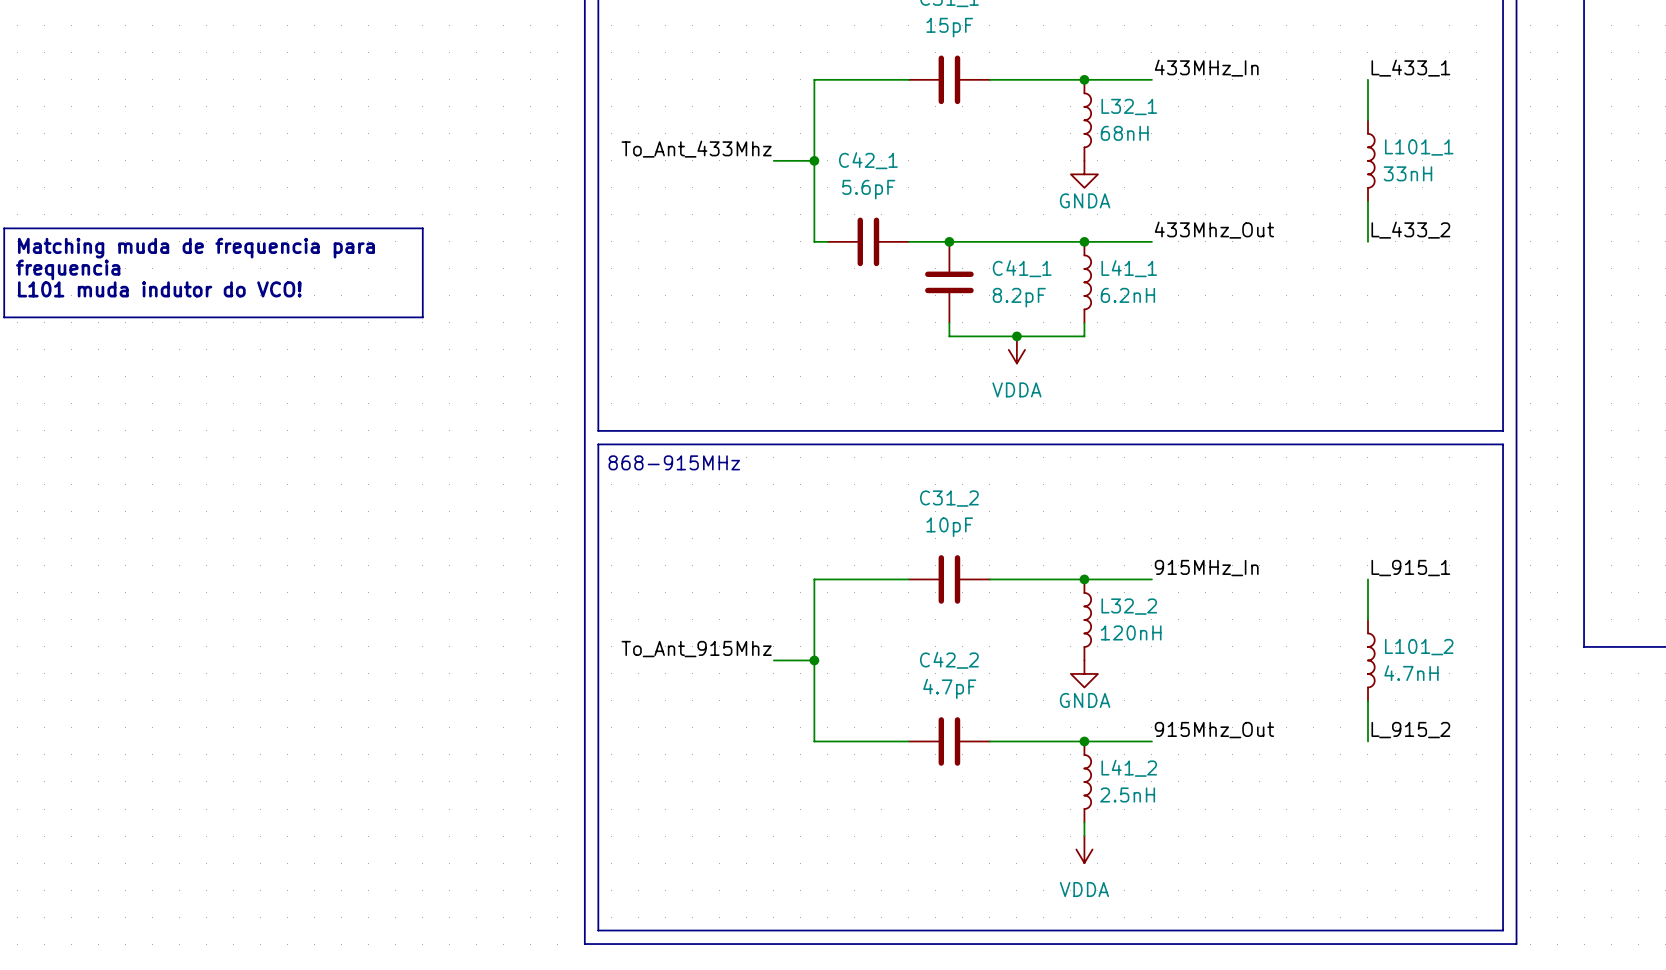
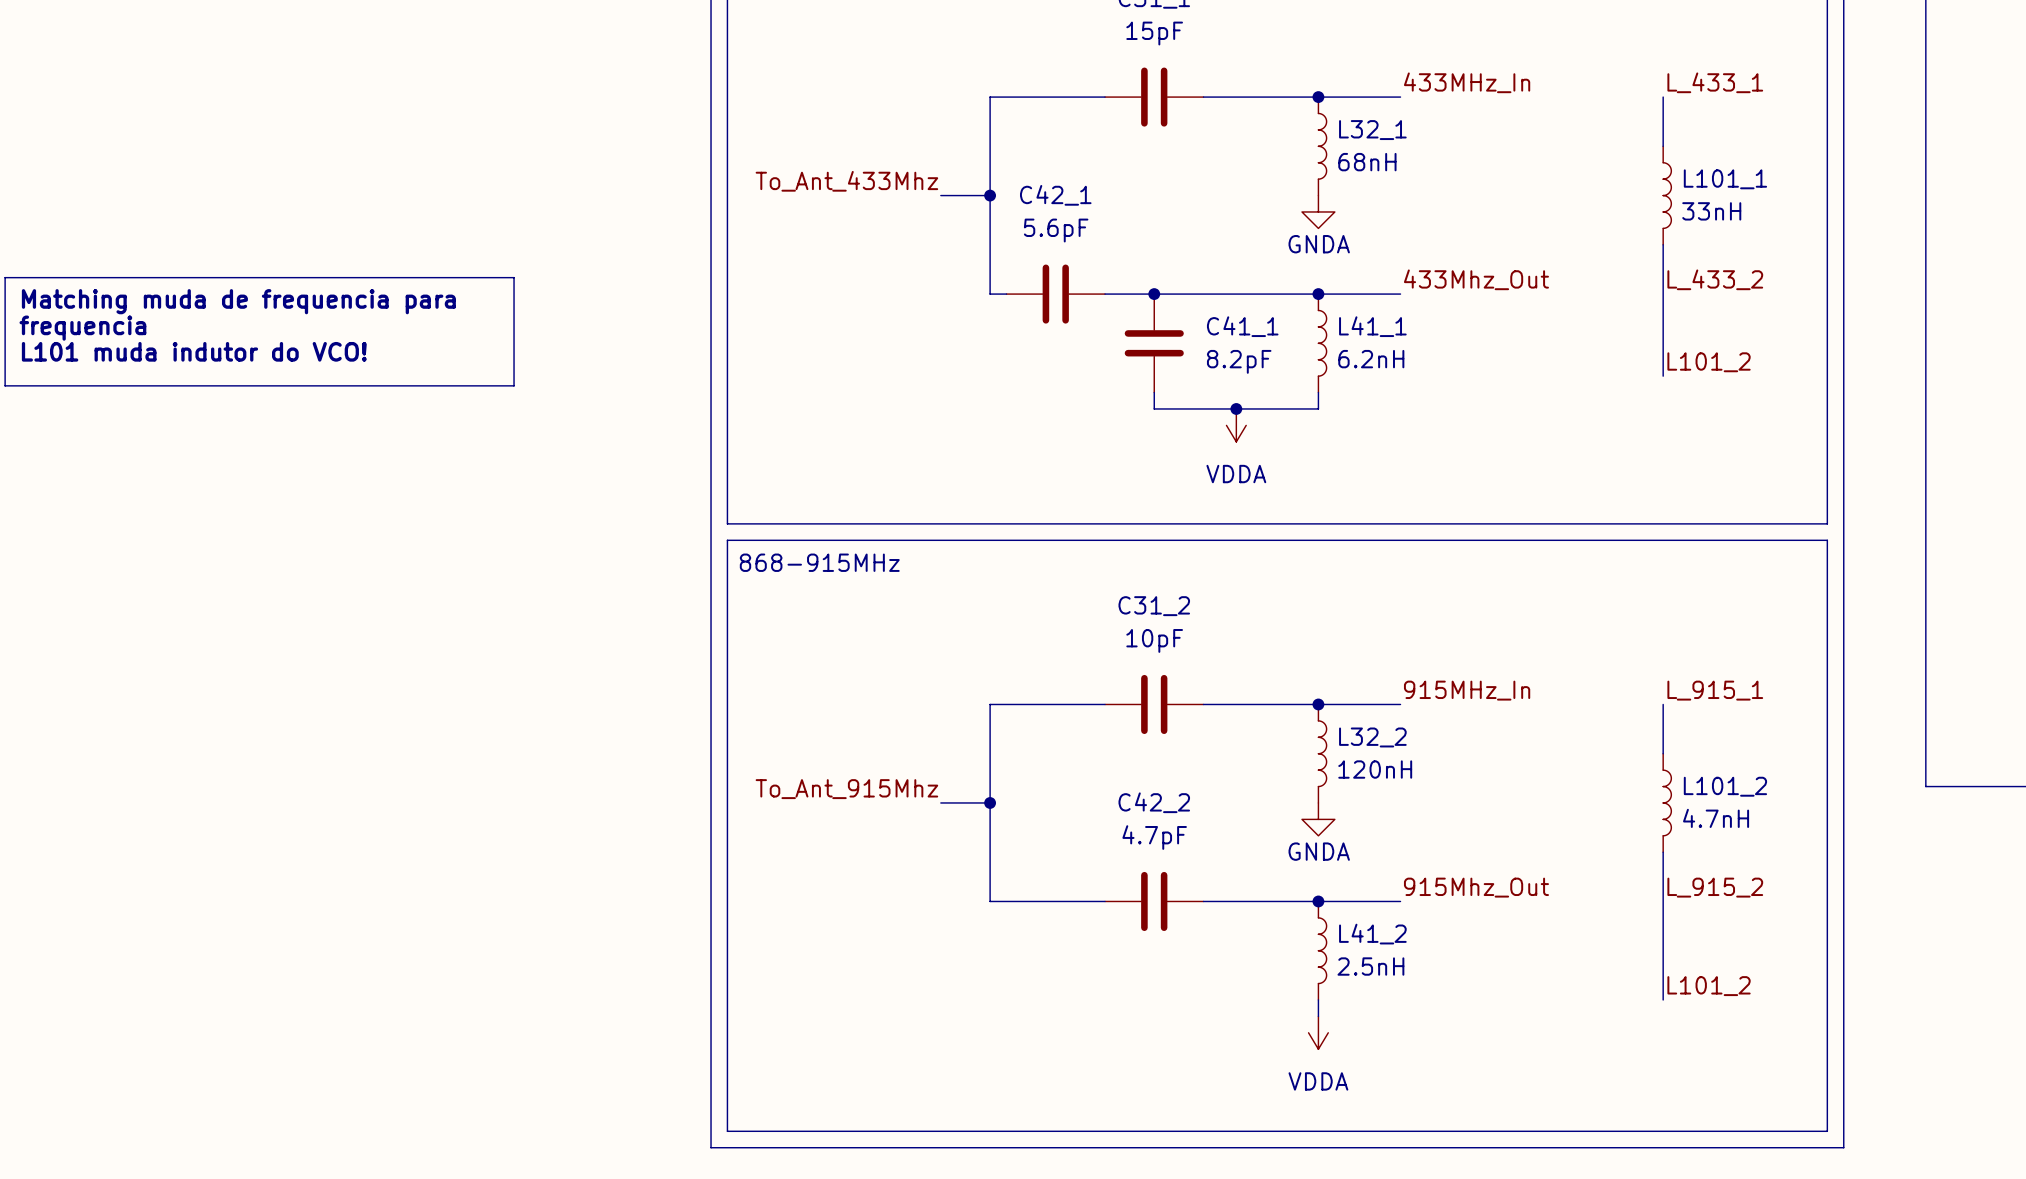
wire: none -> (1663, 294) (1663, 376)
label: none -> L101_2 (1709, 362)
wire: none -> (1663, 901) (1663, 999)
label: none -> L101_2 (1709, 986)

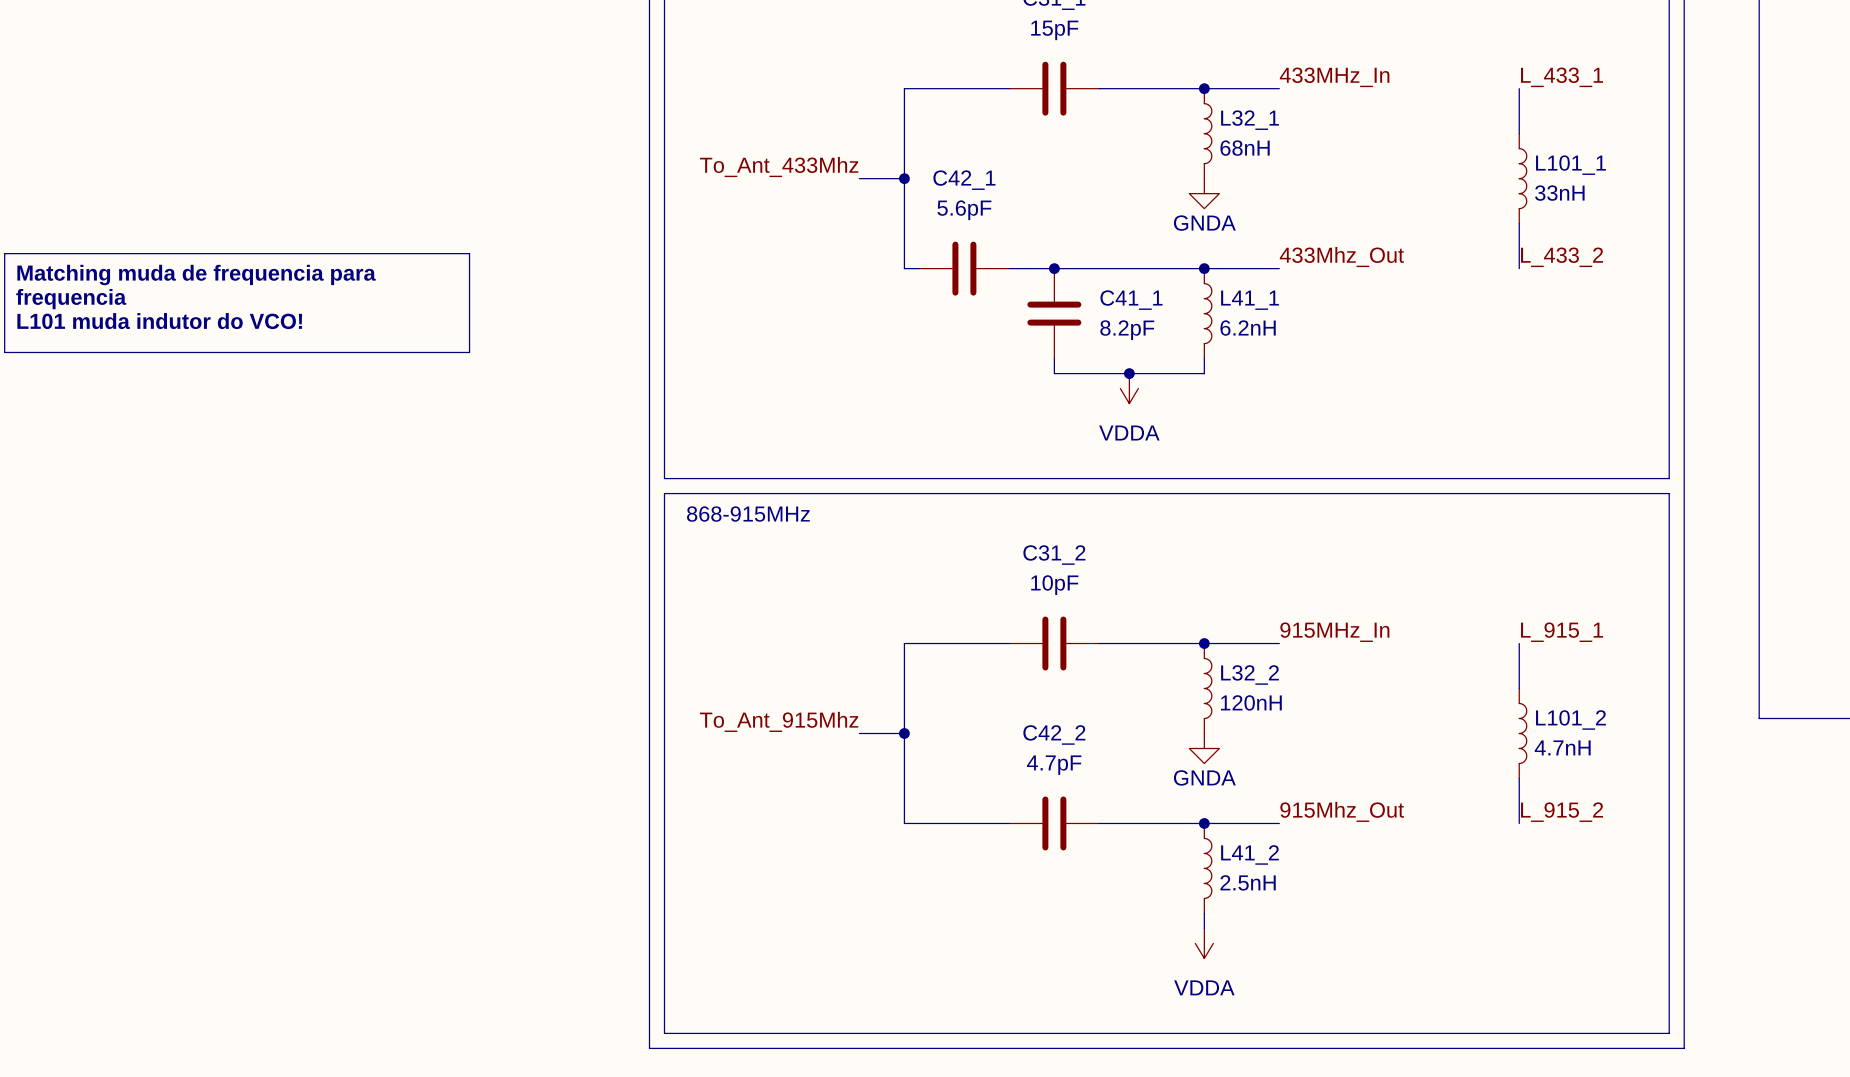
wire: (1663, 294) (1663, 376) -> none
label: L101_2 (1709, 362) -> none
wire: (1663, 901) (1663, 999) -> none
label: L101_2 (1709, 986) -> none

